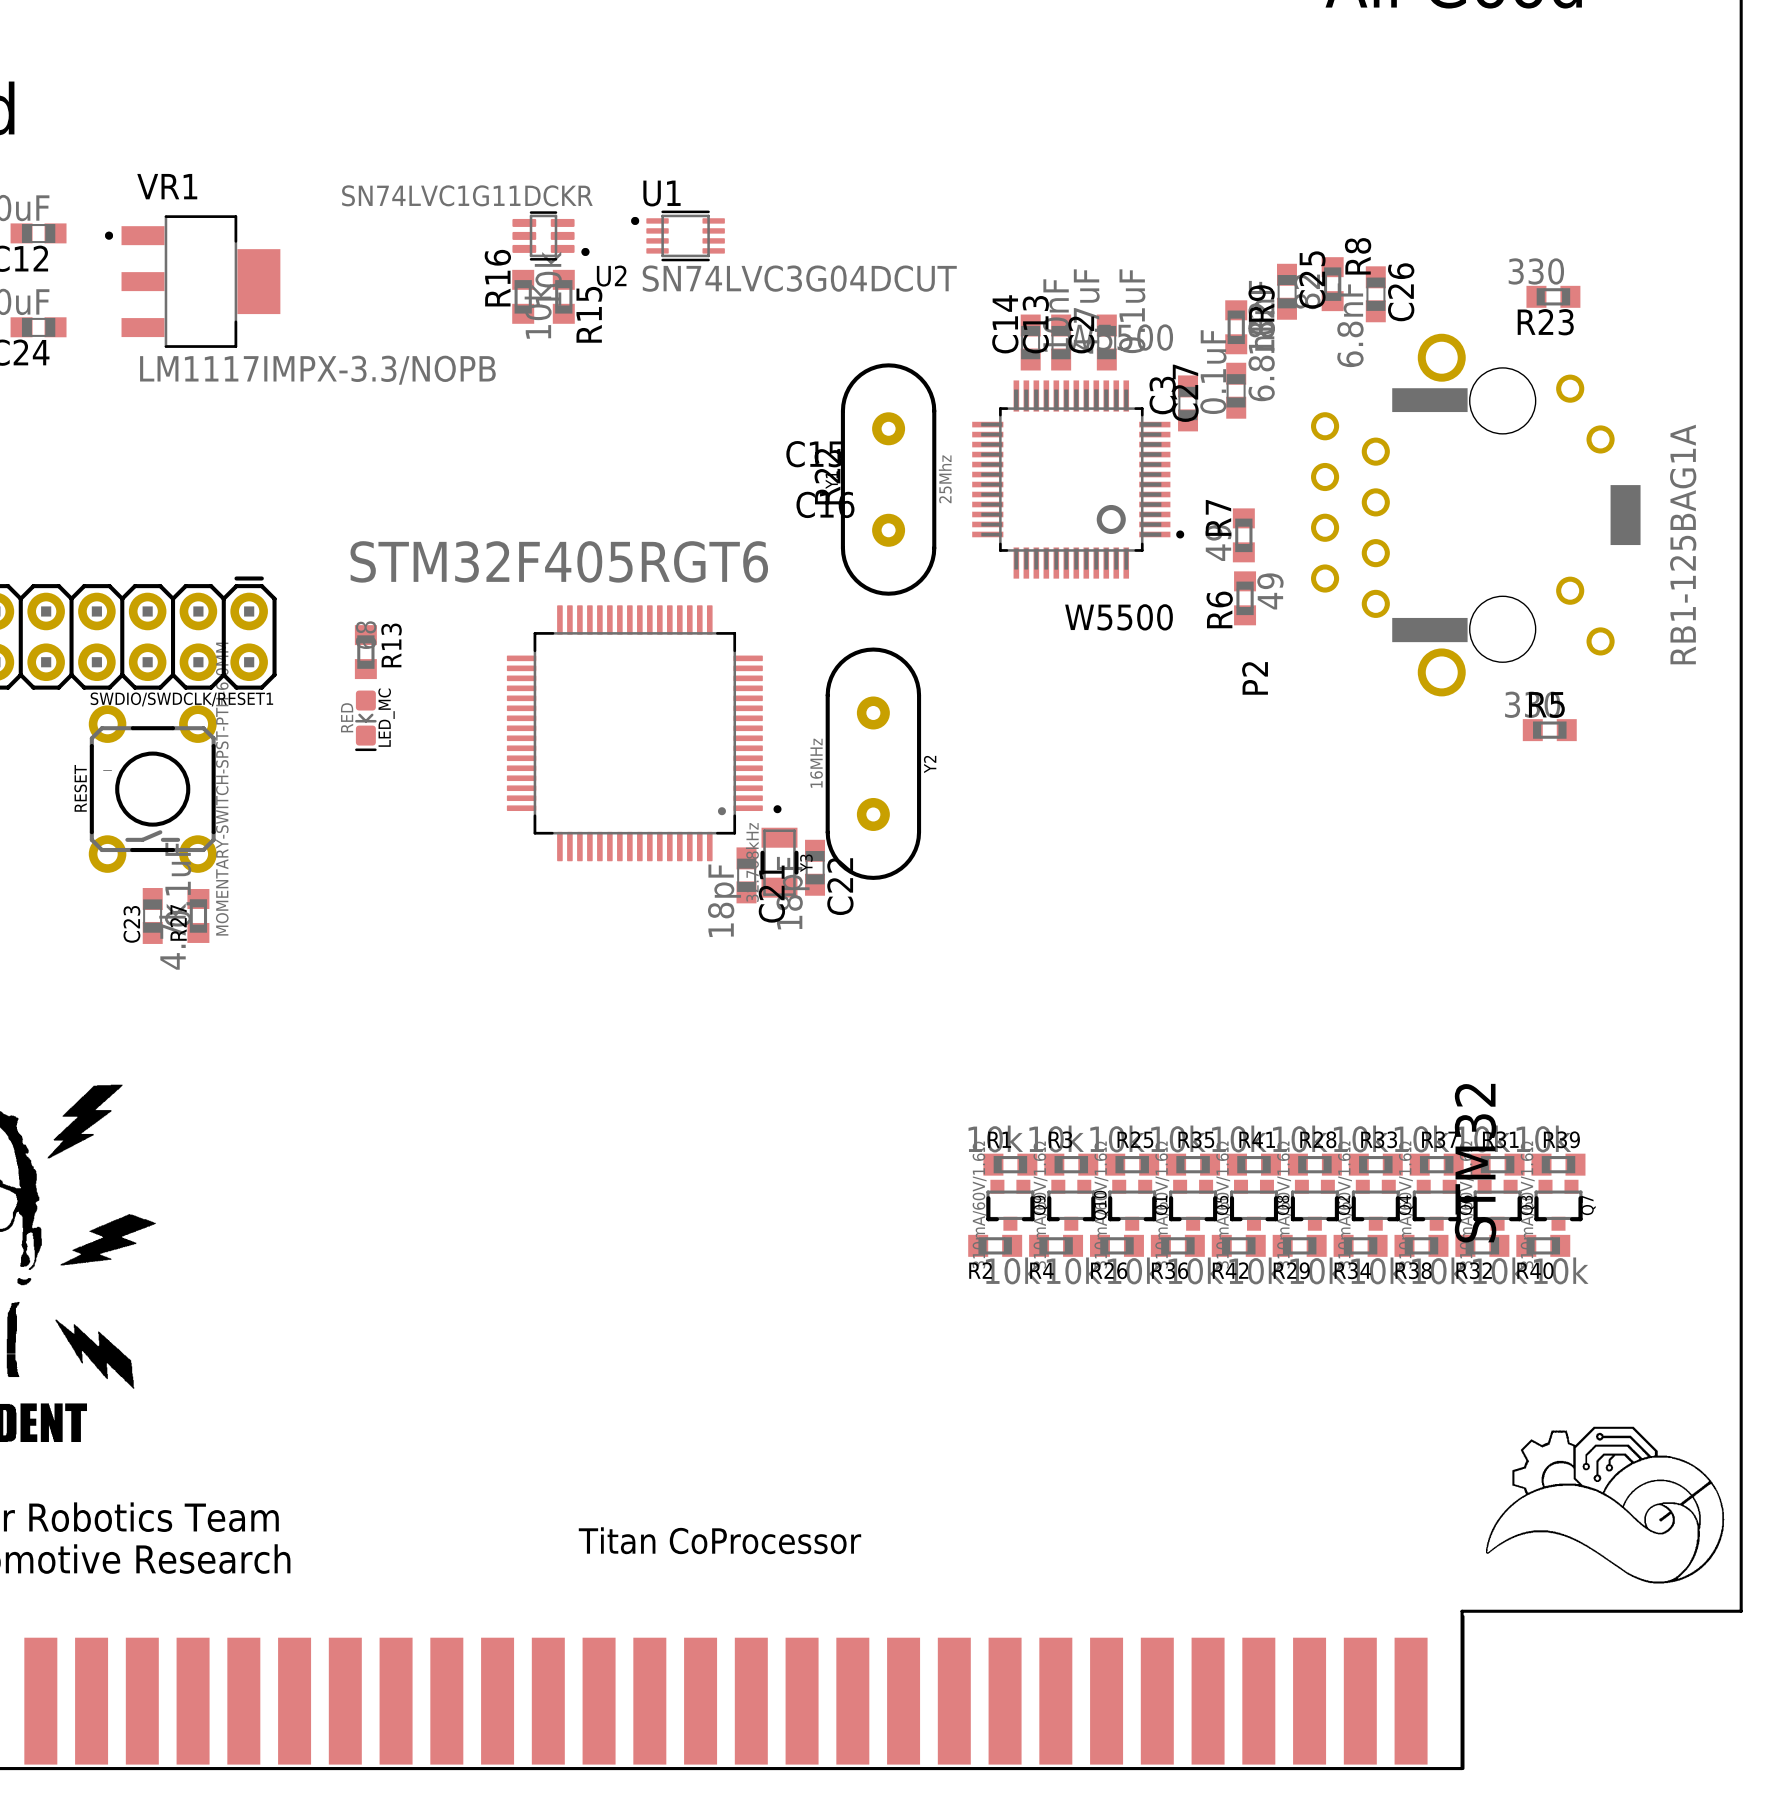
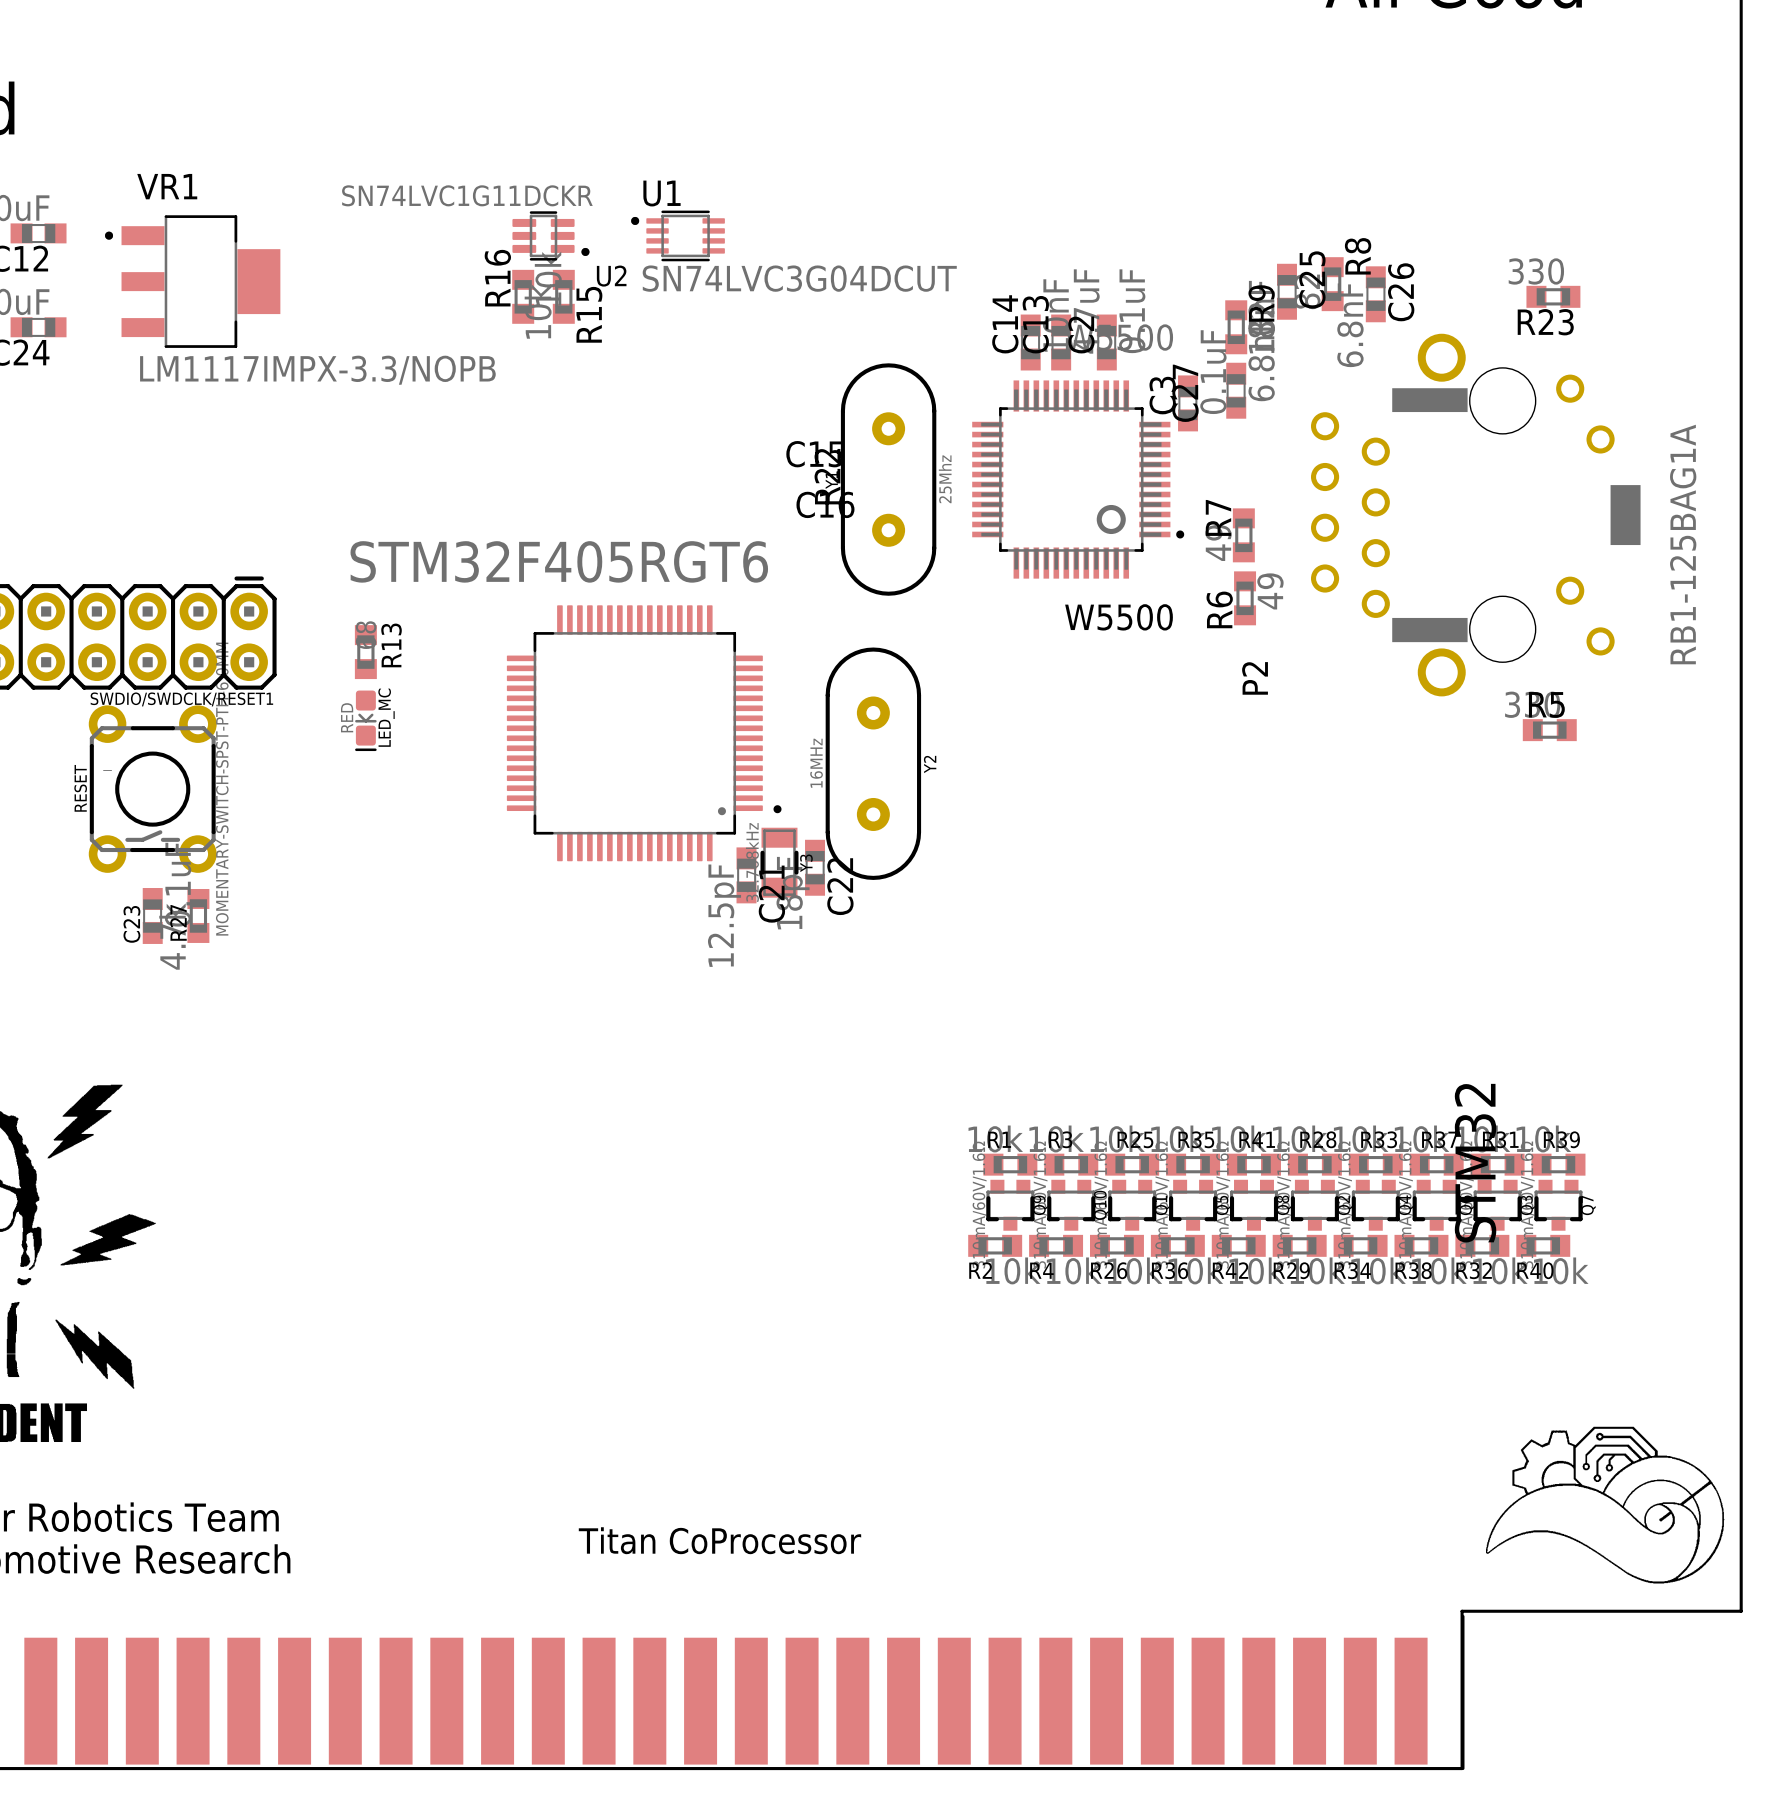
C21 value: 18pF (724, 900) -> 12.5pF (724, 915)

